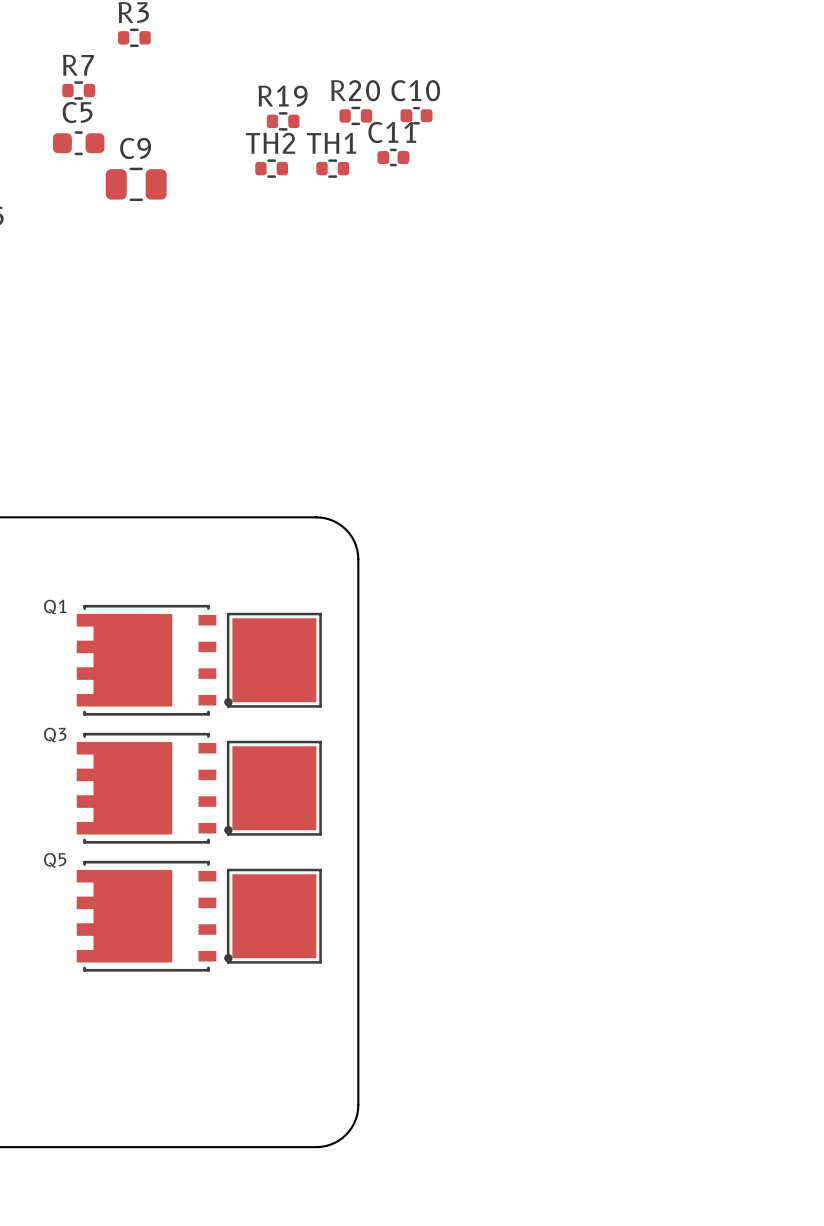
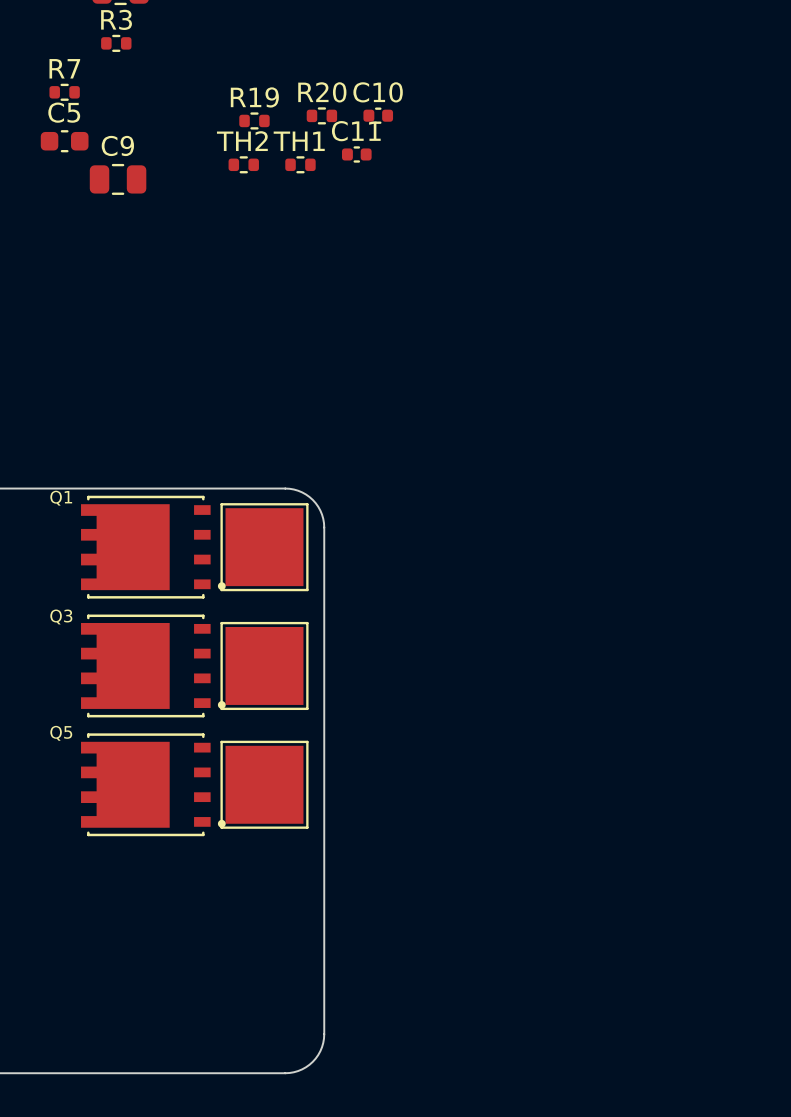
part: none -> (264, 547)
Q1 position: (154, 660) -> (153, 547)
part: (274, 660) -> none
part: none -> (264, 665)
Q3 position: (154, 788) -> (153, 665)
part: (274, 788) -> none
part: none -> (264, 784)
Q5 position: (154, 916) -> (153, 784)
part: (274, 916) -> none

